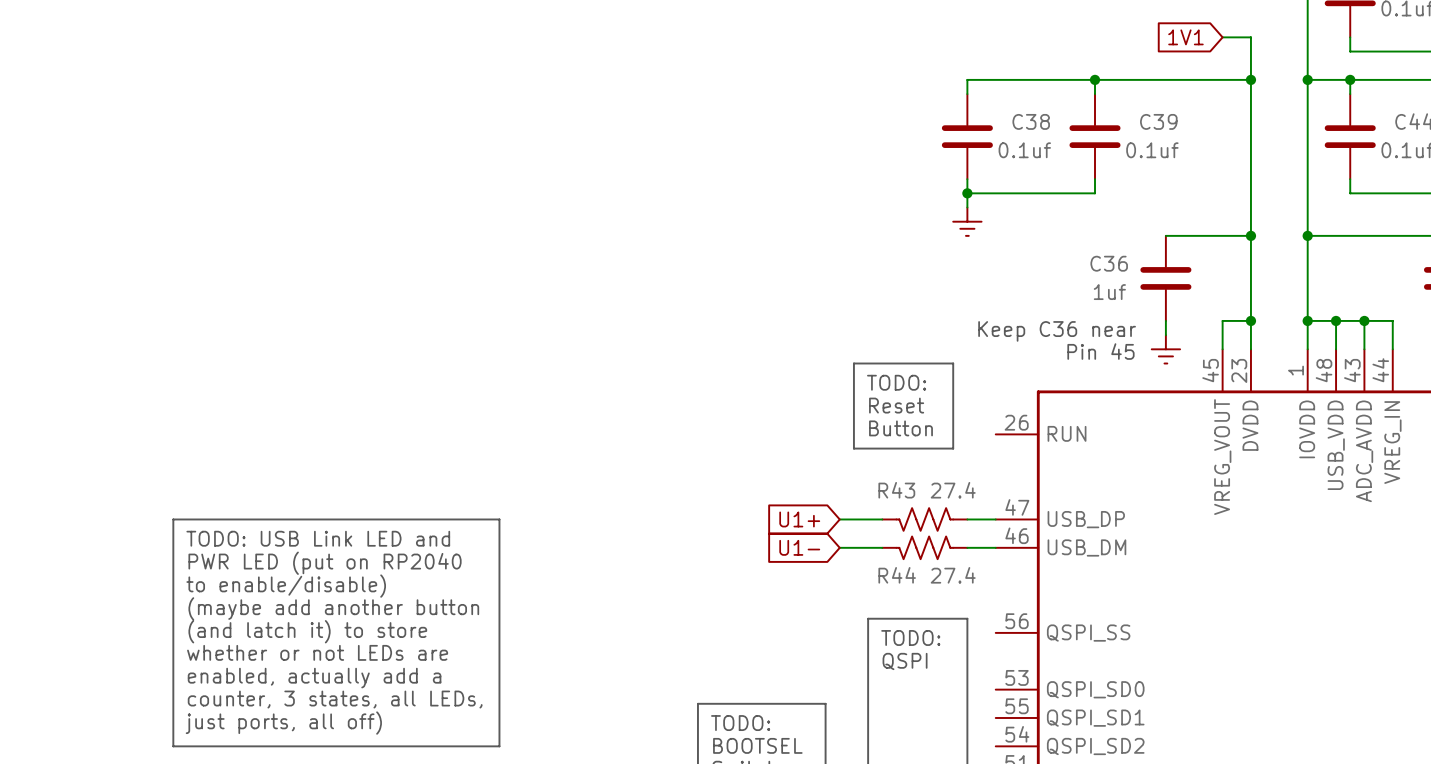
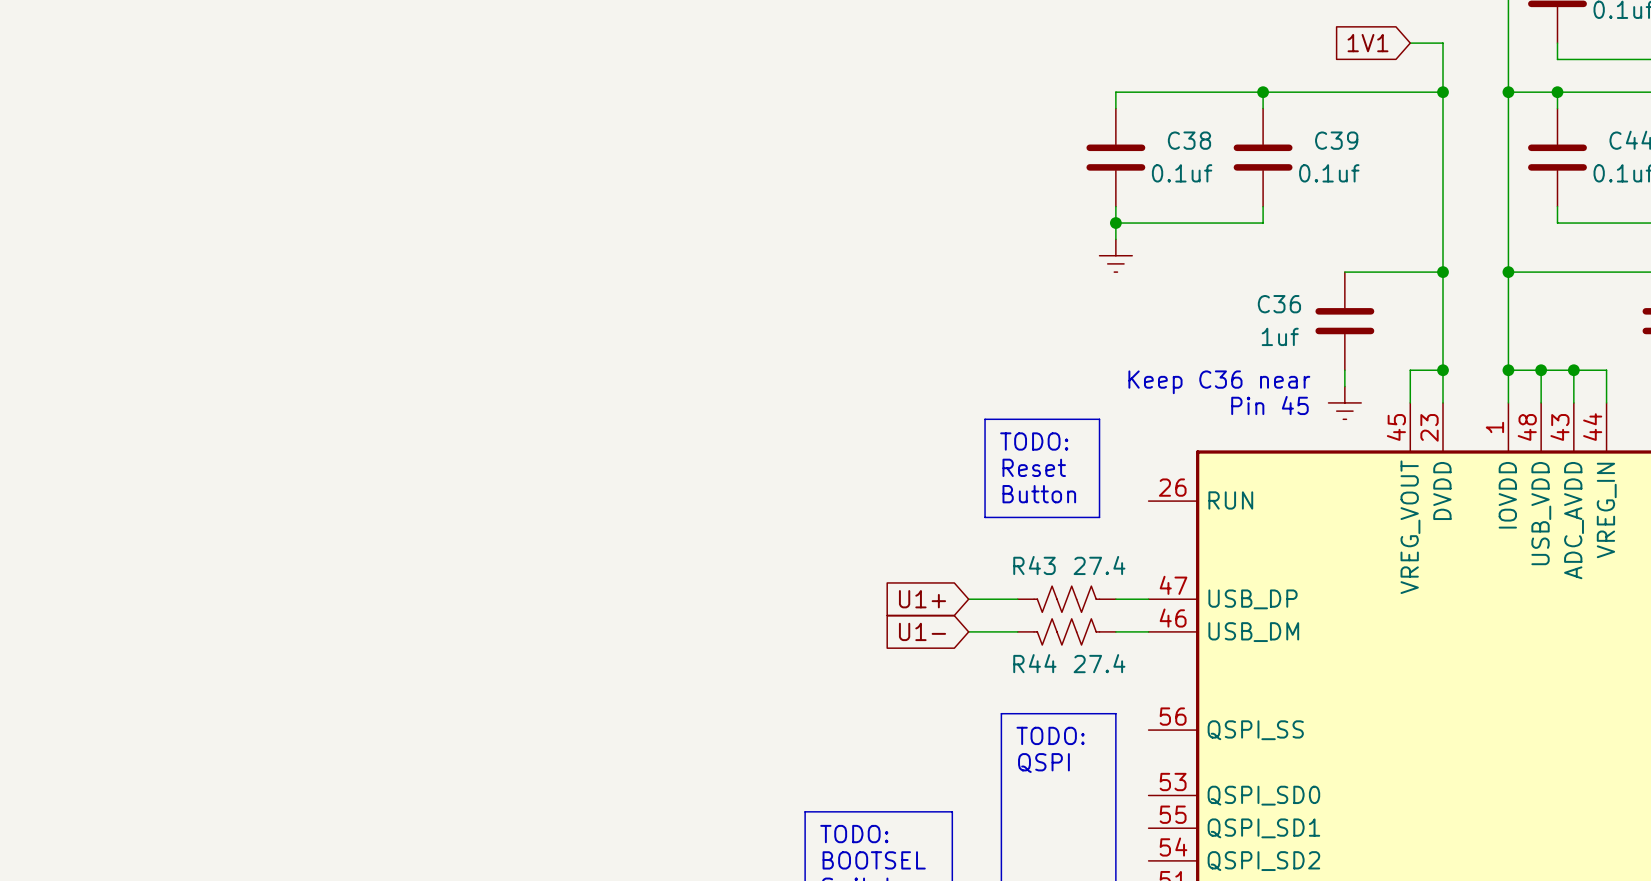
line: (173, 519) (499, 519) (499, 746) (173, 746) (173, 519) -> none
text: TODO: USB Link LED and (318, 538) -> none
text: PWR LED (put on RP2040 (325, 563) -> none
text: to enable/disable) (286, 586) -> none
text: (maybe add another button (333, 608) -> none
text: (and latch it) to store (307, 631) -> none
text: whether or not LEDs are (317, 652) -> none
text: enabled, actually add a (314, 678) -> none
text: counter, 3 states, all LEDs, (335, 699) -> none
text: just ports, all off) (283, 723) -> none

